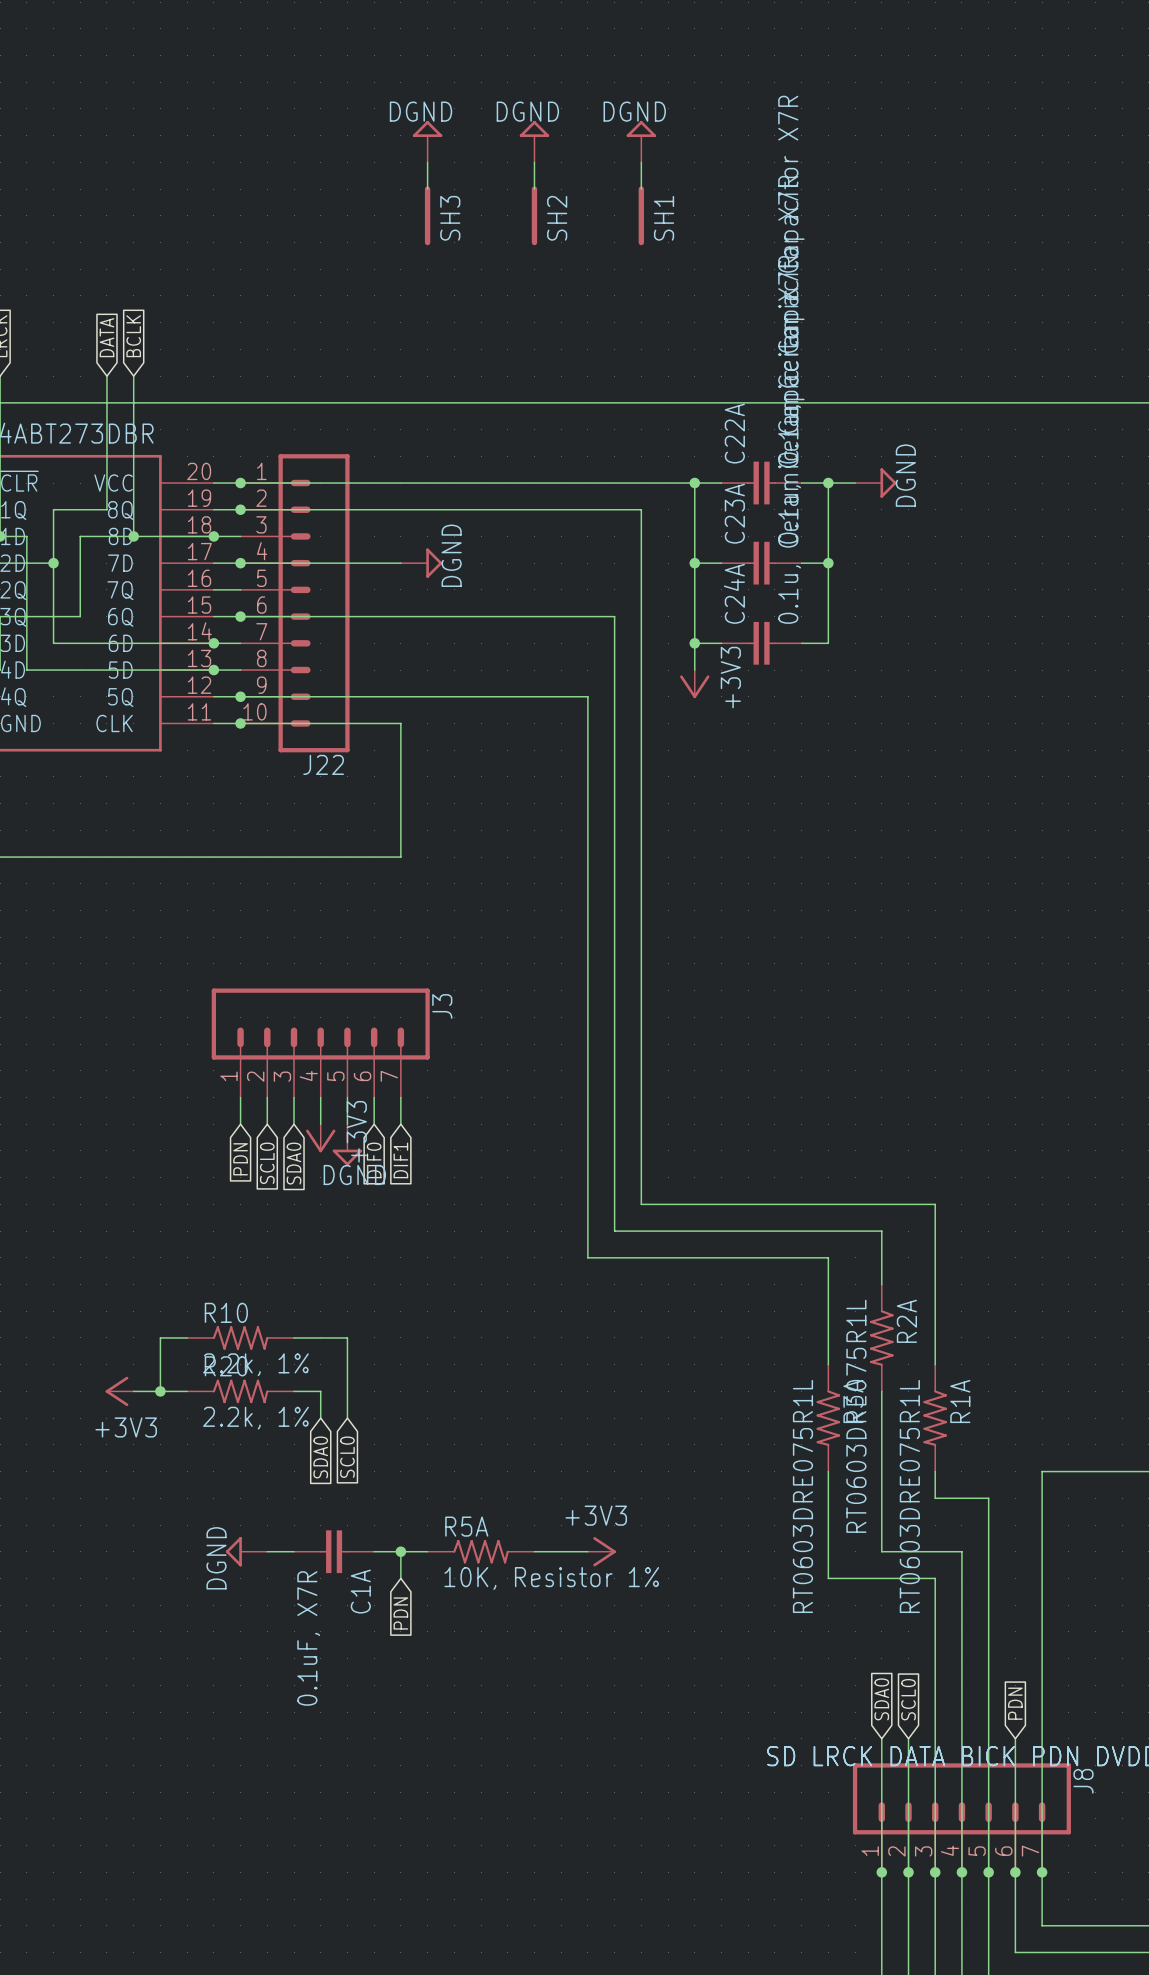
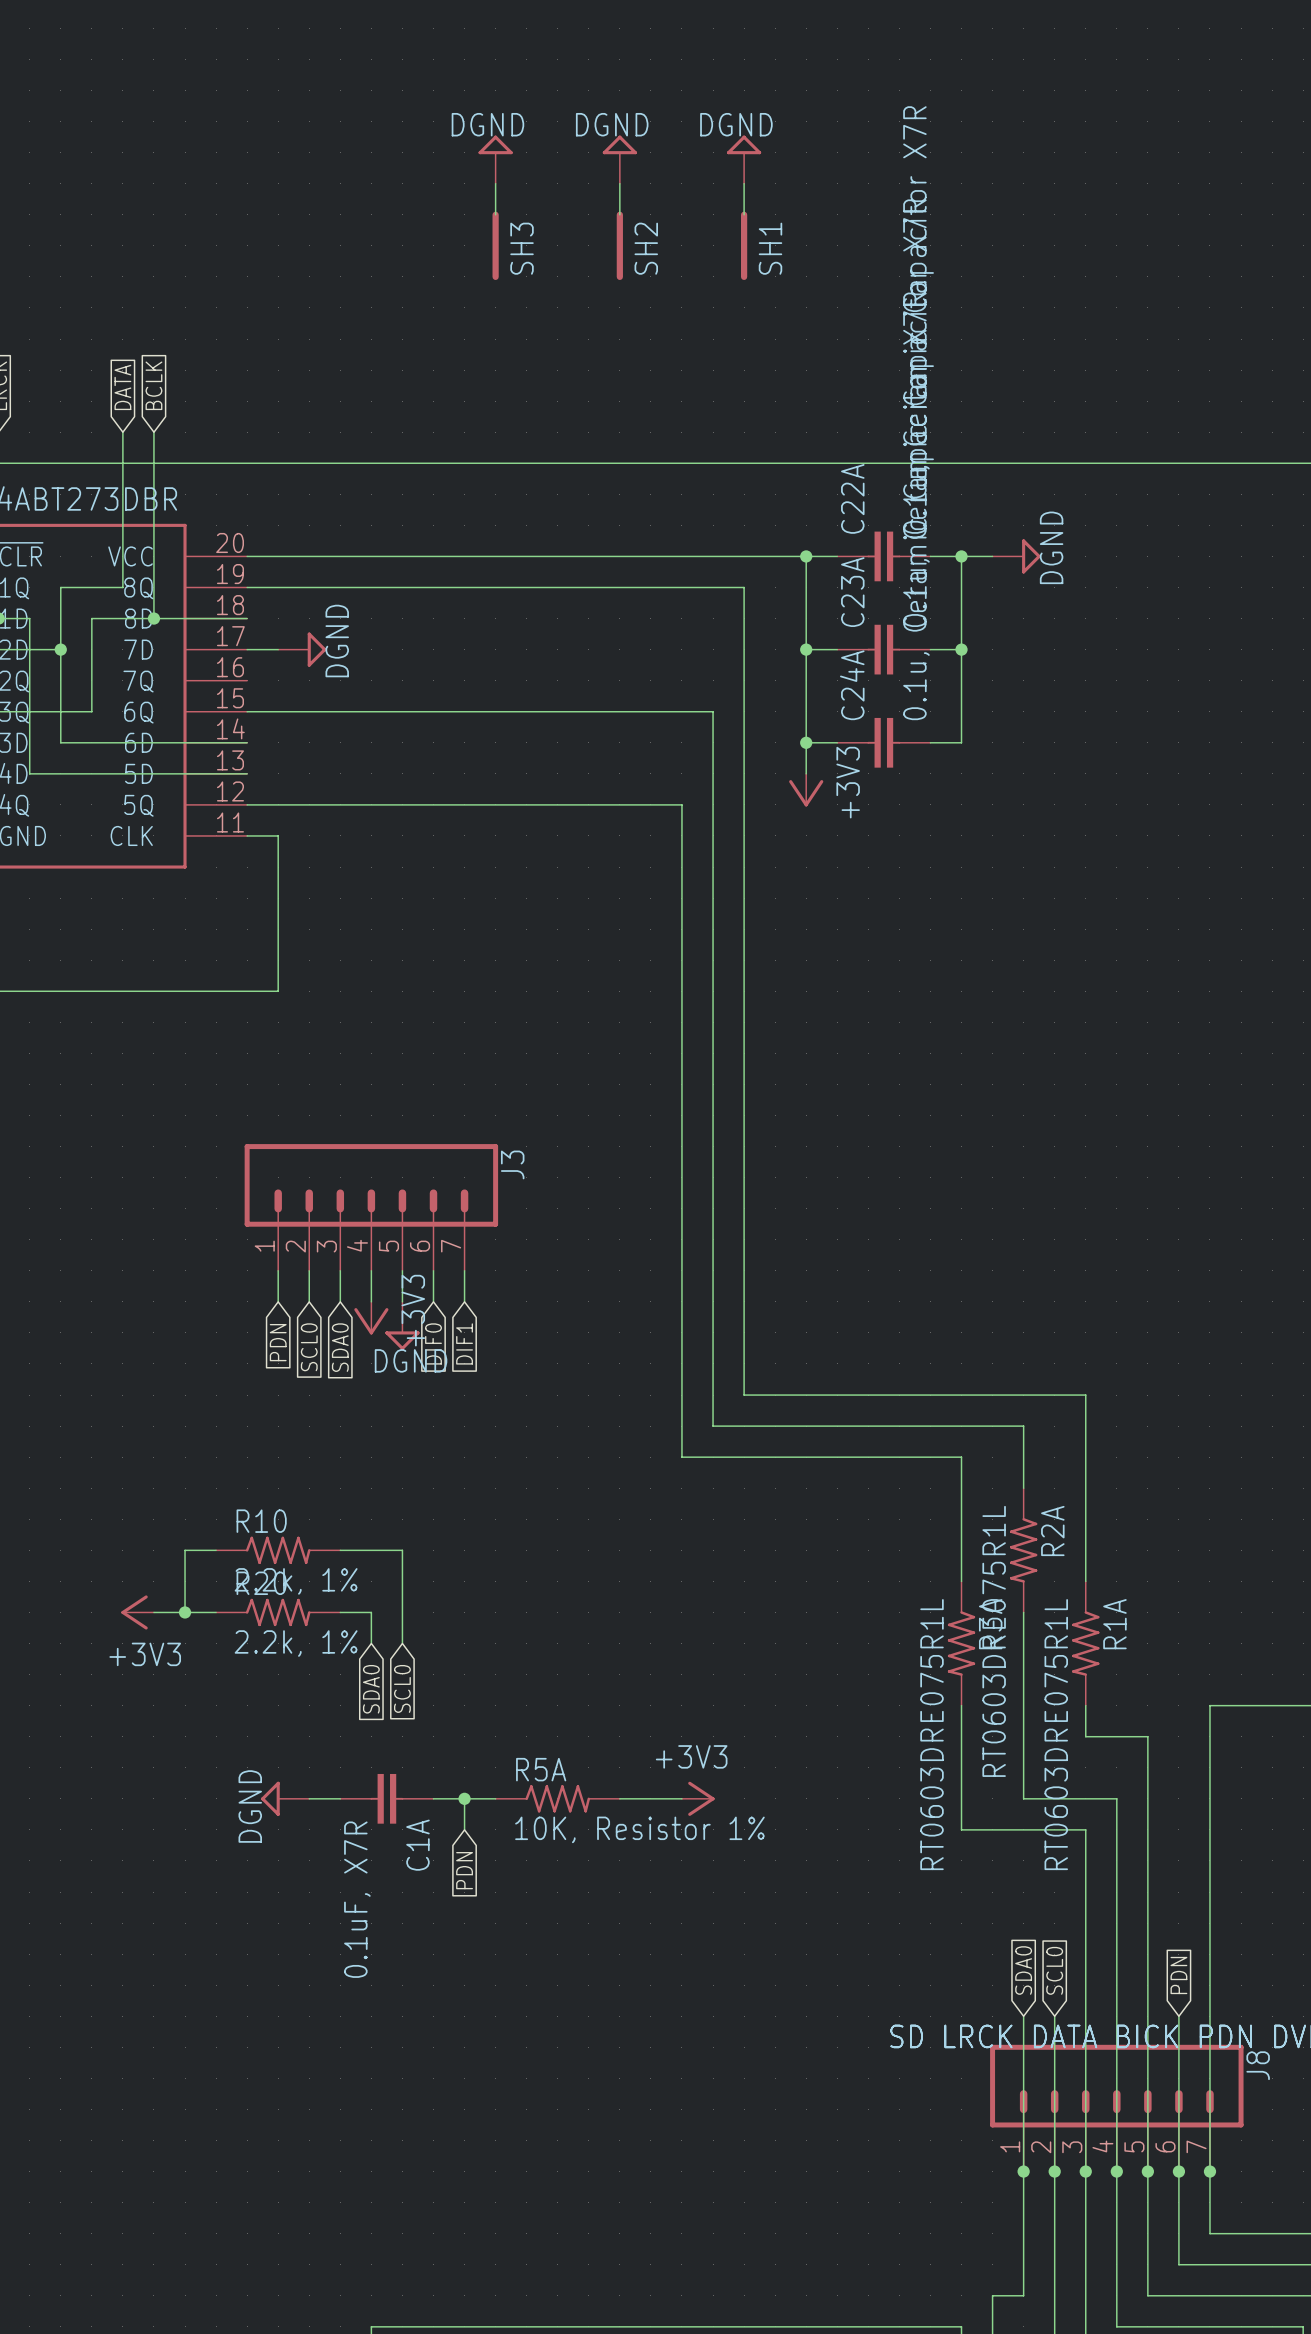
junction: (240, 483) -> none
junction: (240, 509) -> none
wire: (213, 536) (240, 536) -> none
junction: (213, 536) -> none
wire: (240, 563) (400, 563) -> none
junction: (240, 563) -> none
power symbol position: DGND (421, 563) -> DGND (302, 649)
wire: (213, 589) (240, 589) -> none
J22: (295, 603) -> none
junction: (240, 616) -> none
wire: (213, 643) (240, 643) -> none
junction: (213, 643) -> none
wire: (213, 670) (240, 670) -> none
junction: (213, 670) -> none
junction: (240, 696) -> none
wire: (240, 723) (400, 723) (400, 857) (240, 857) -> (278, 835) (278, 991)
junction: (240, 723) -> none

